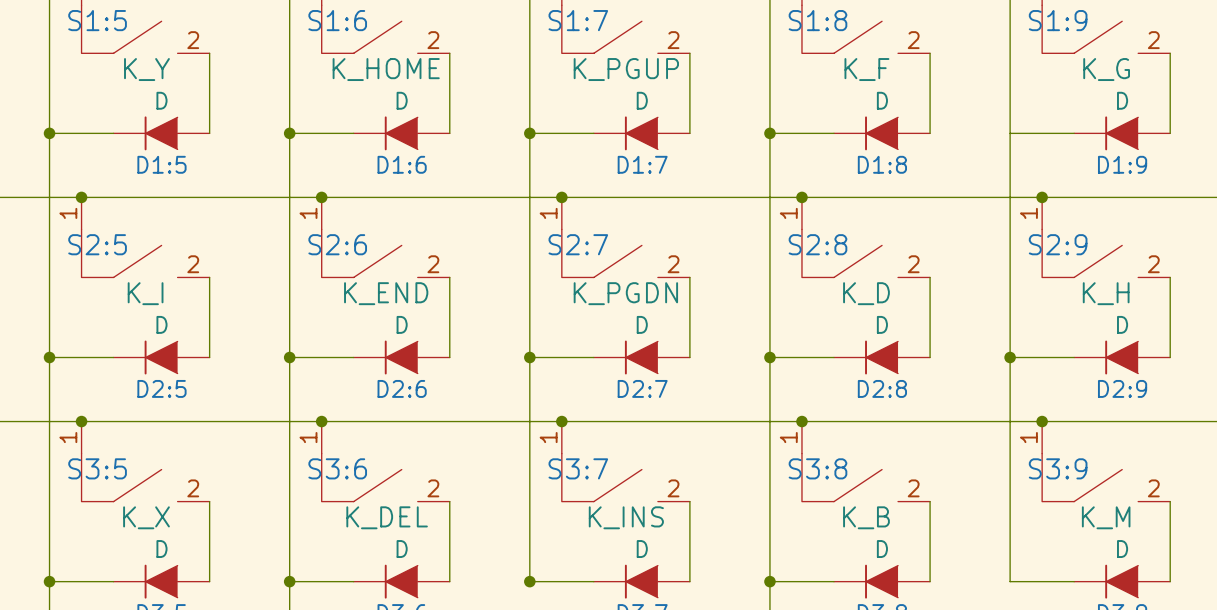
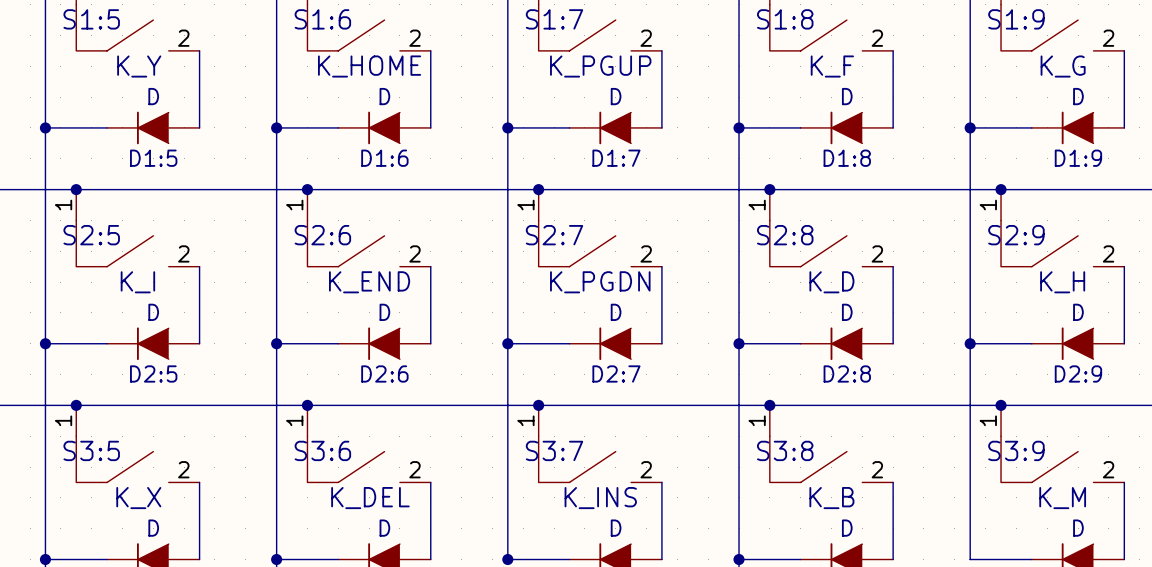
junction: none -> (970, 127)

